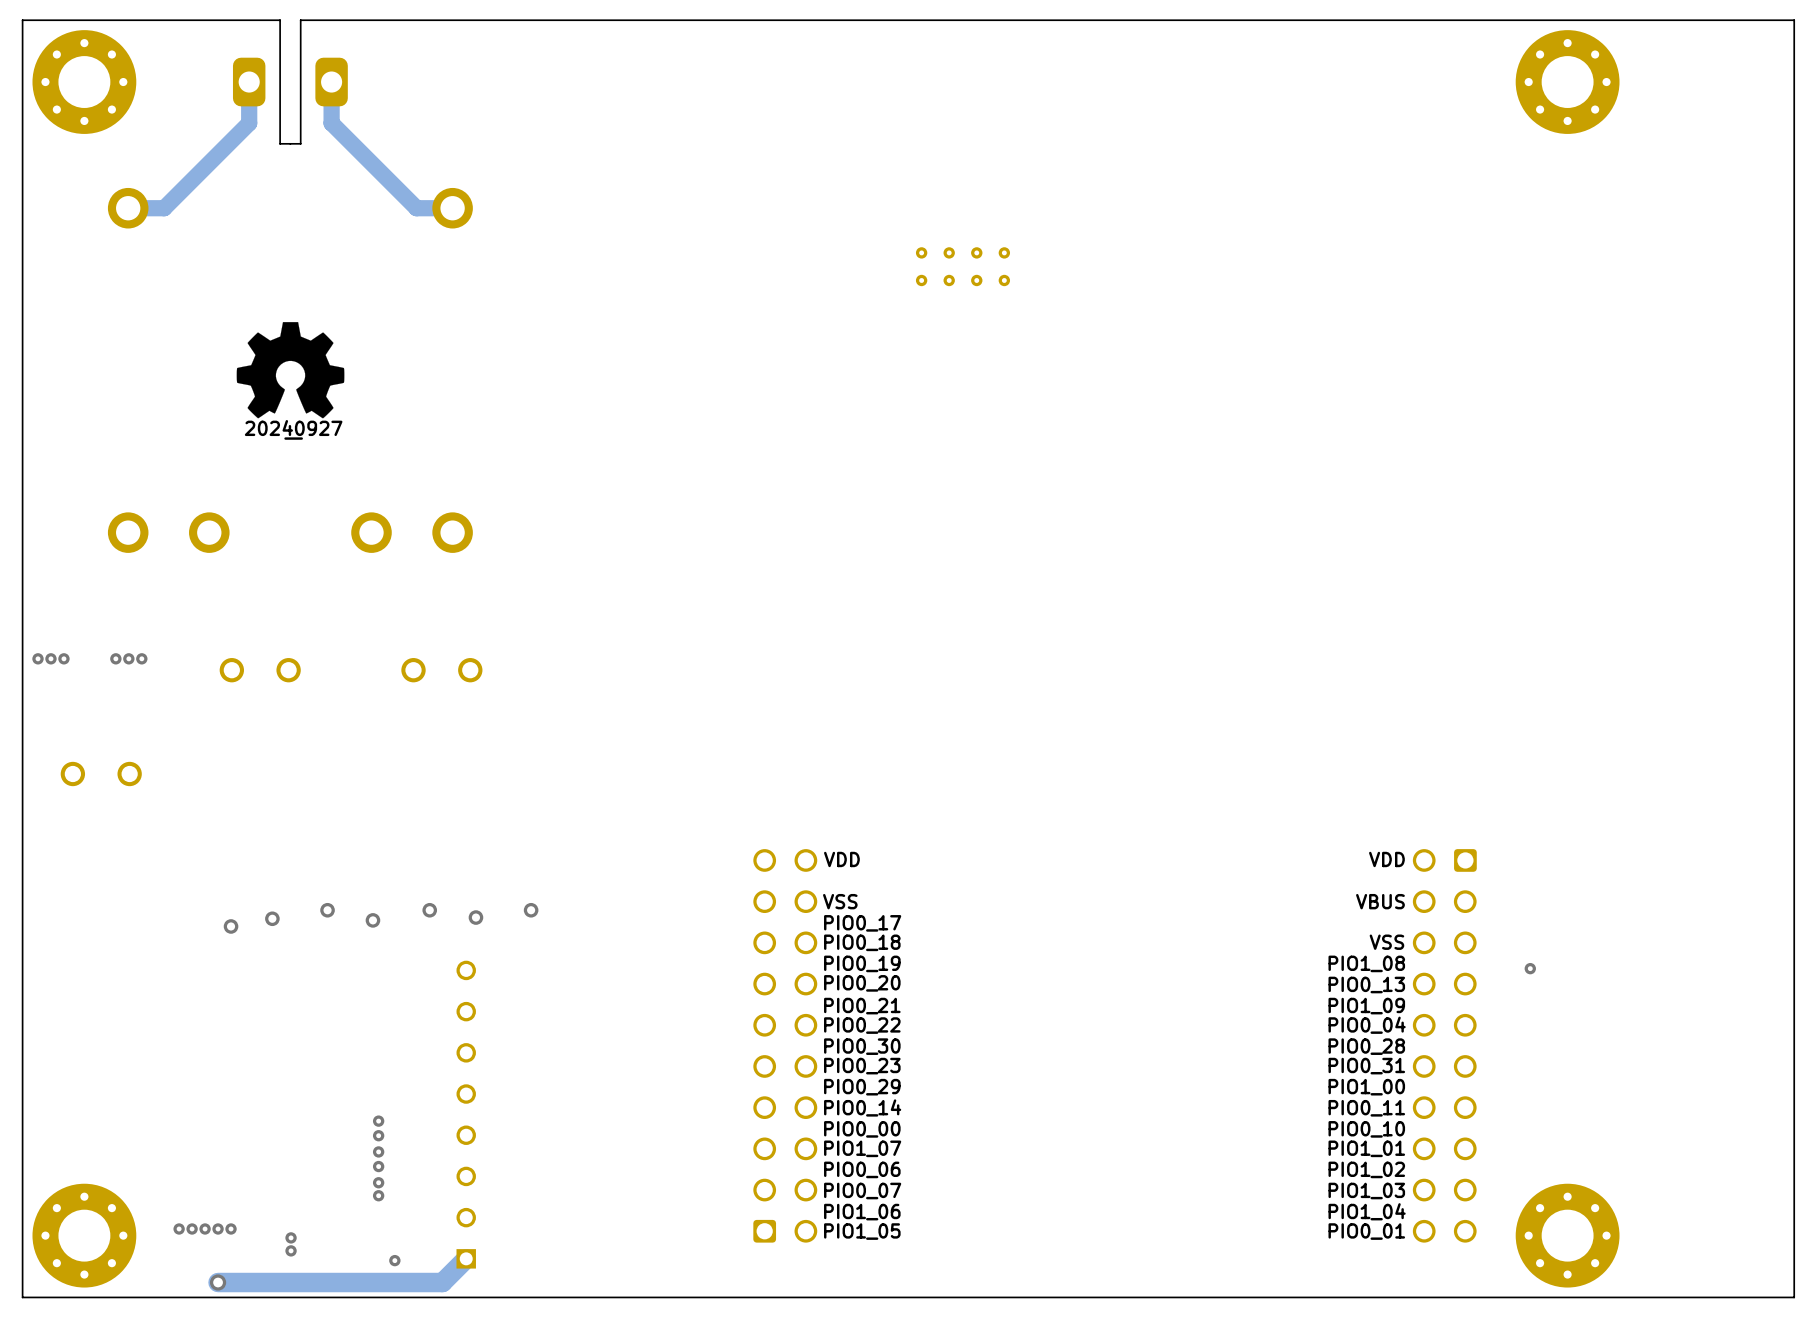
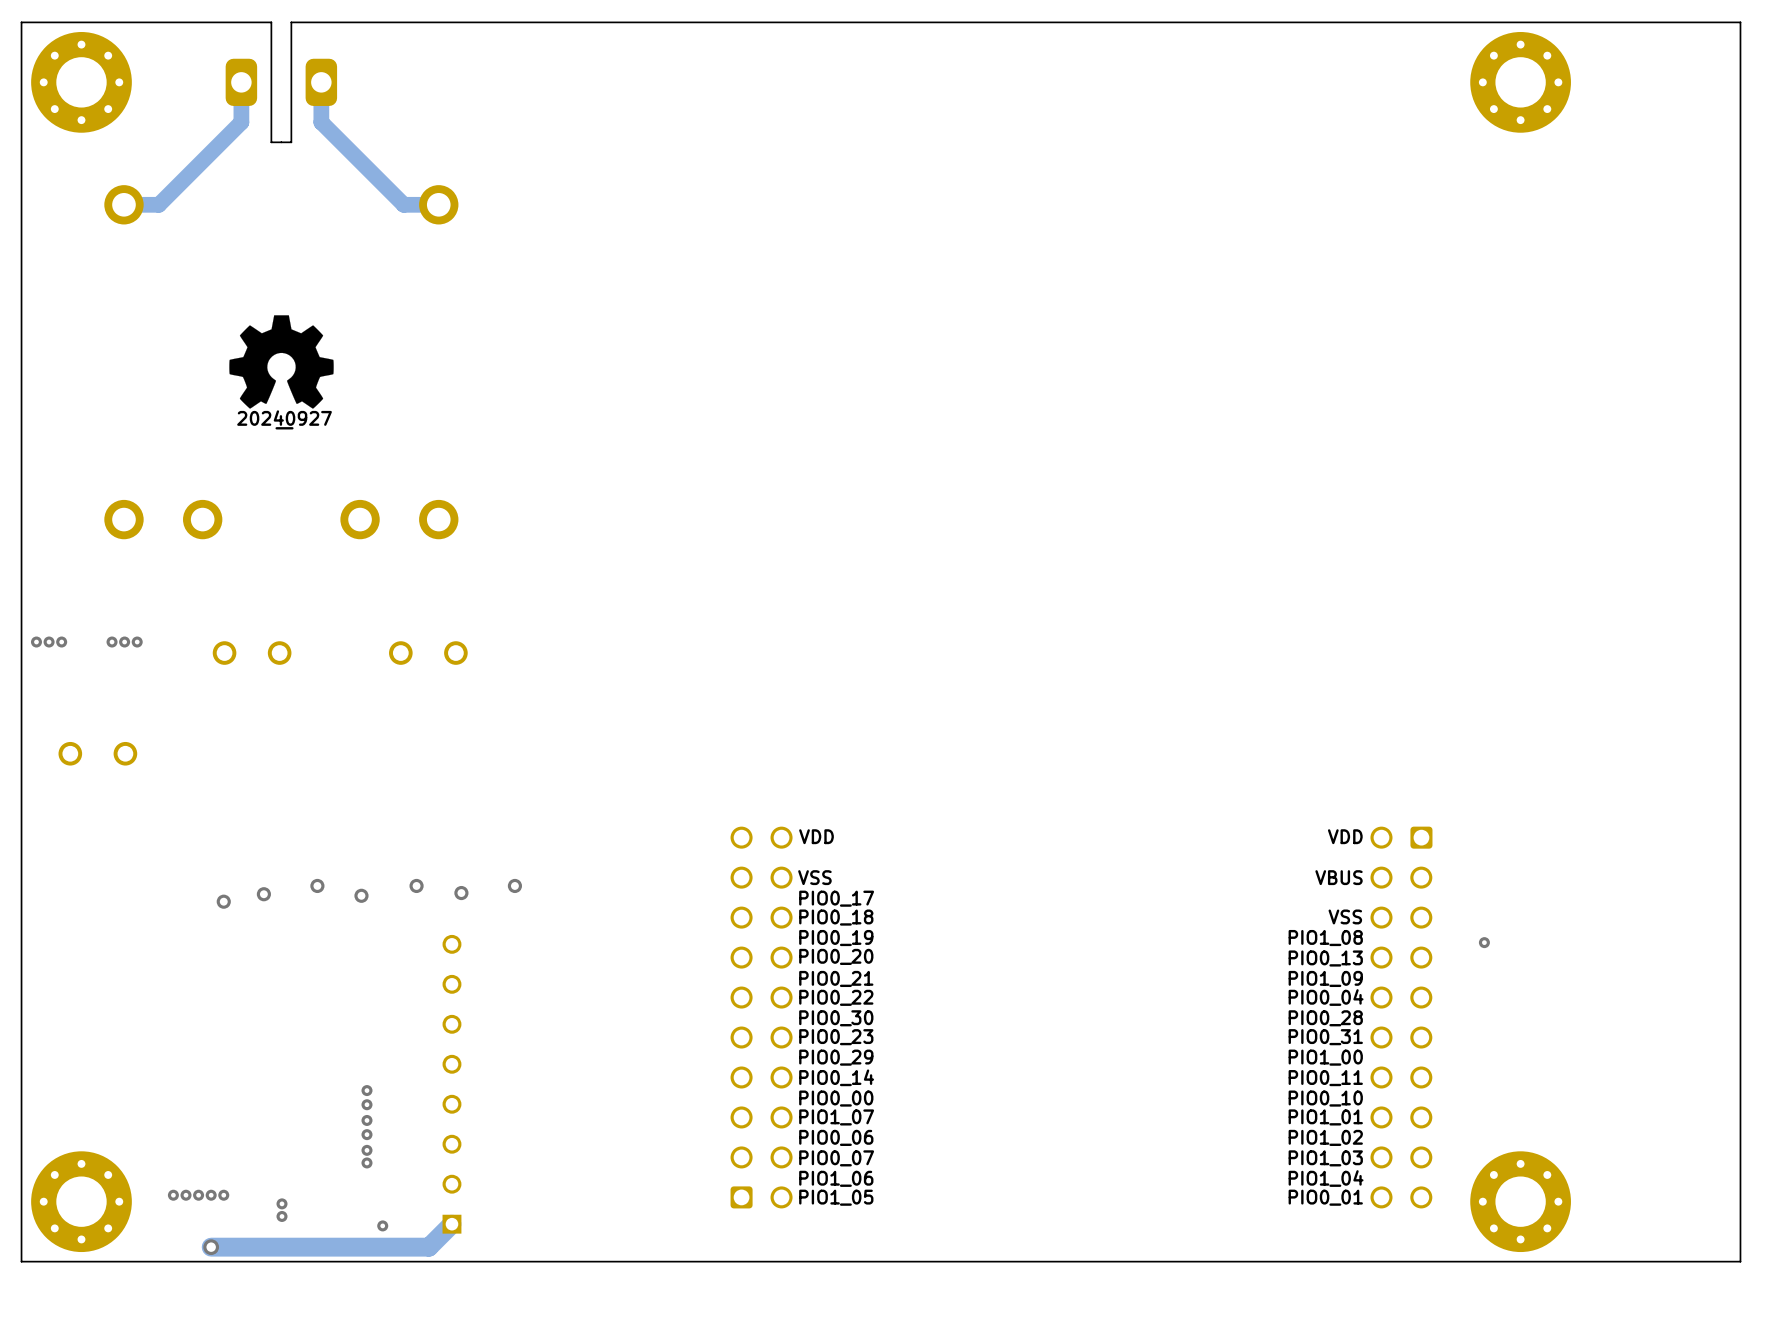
part: (921, 252) -> none
part: (949, 252) -> none
part: (976, 252) -> none
part: (1004, 252) -> none
part: (921, 280) -> none
part: (949, 280) -> none
part: (976, 280) -> none
part: (1004, 280) -> none

